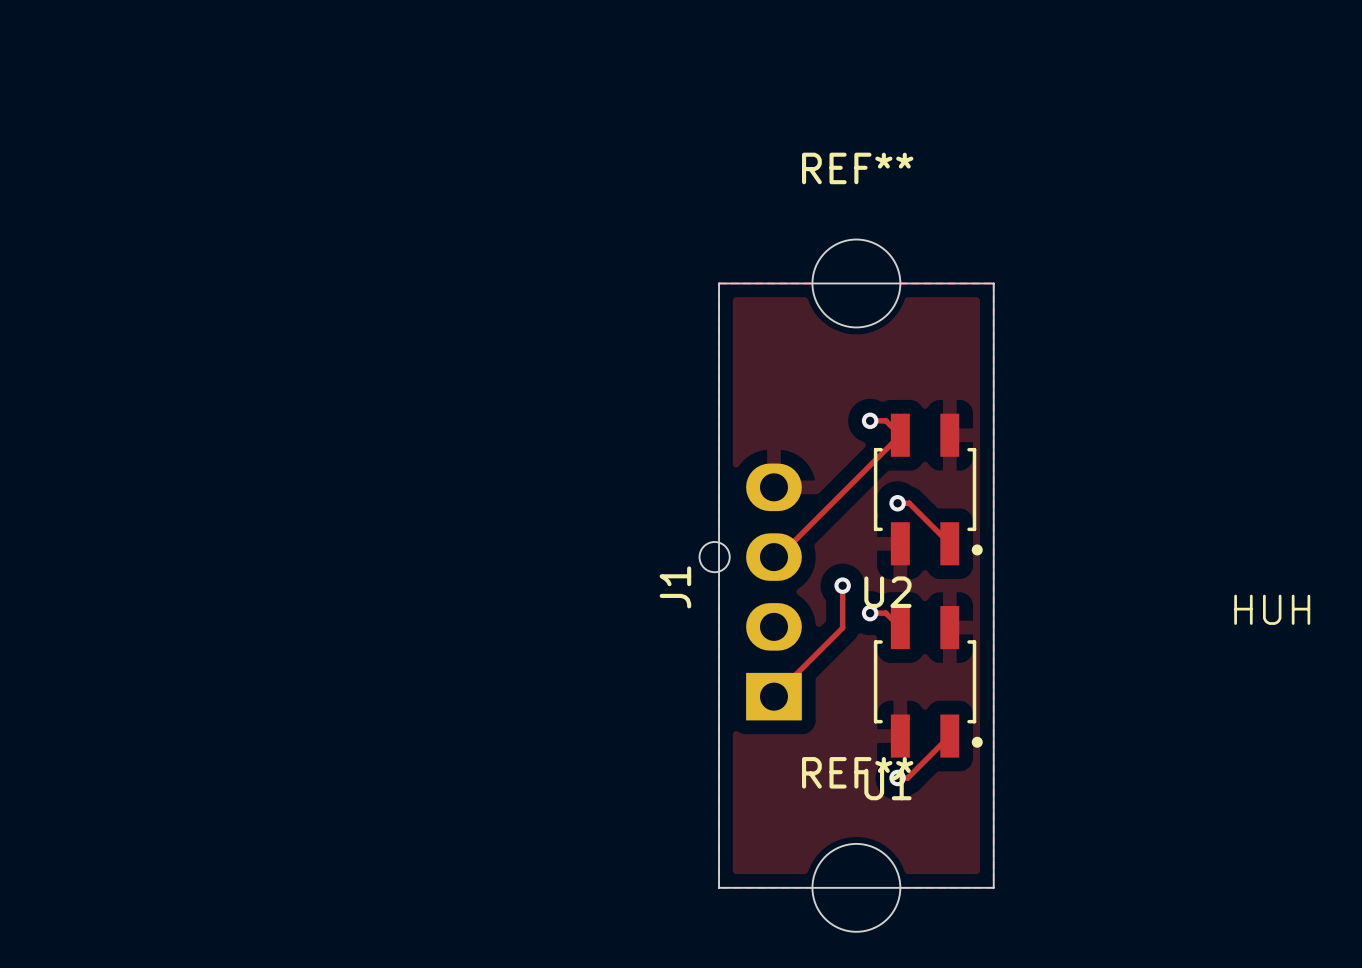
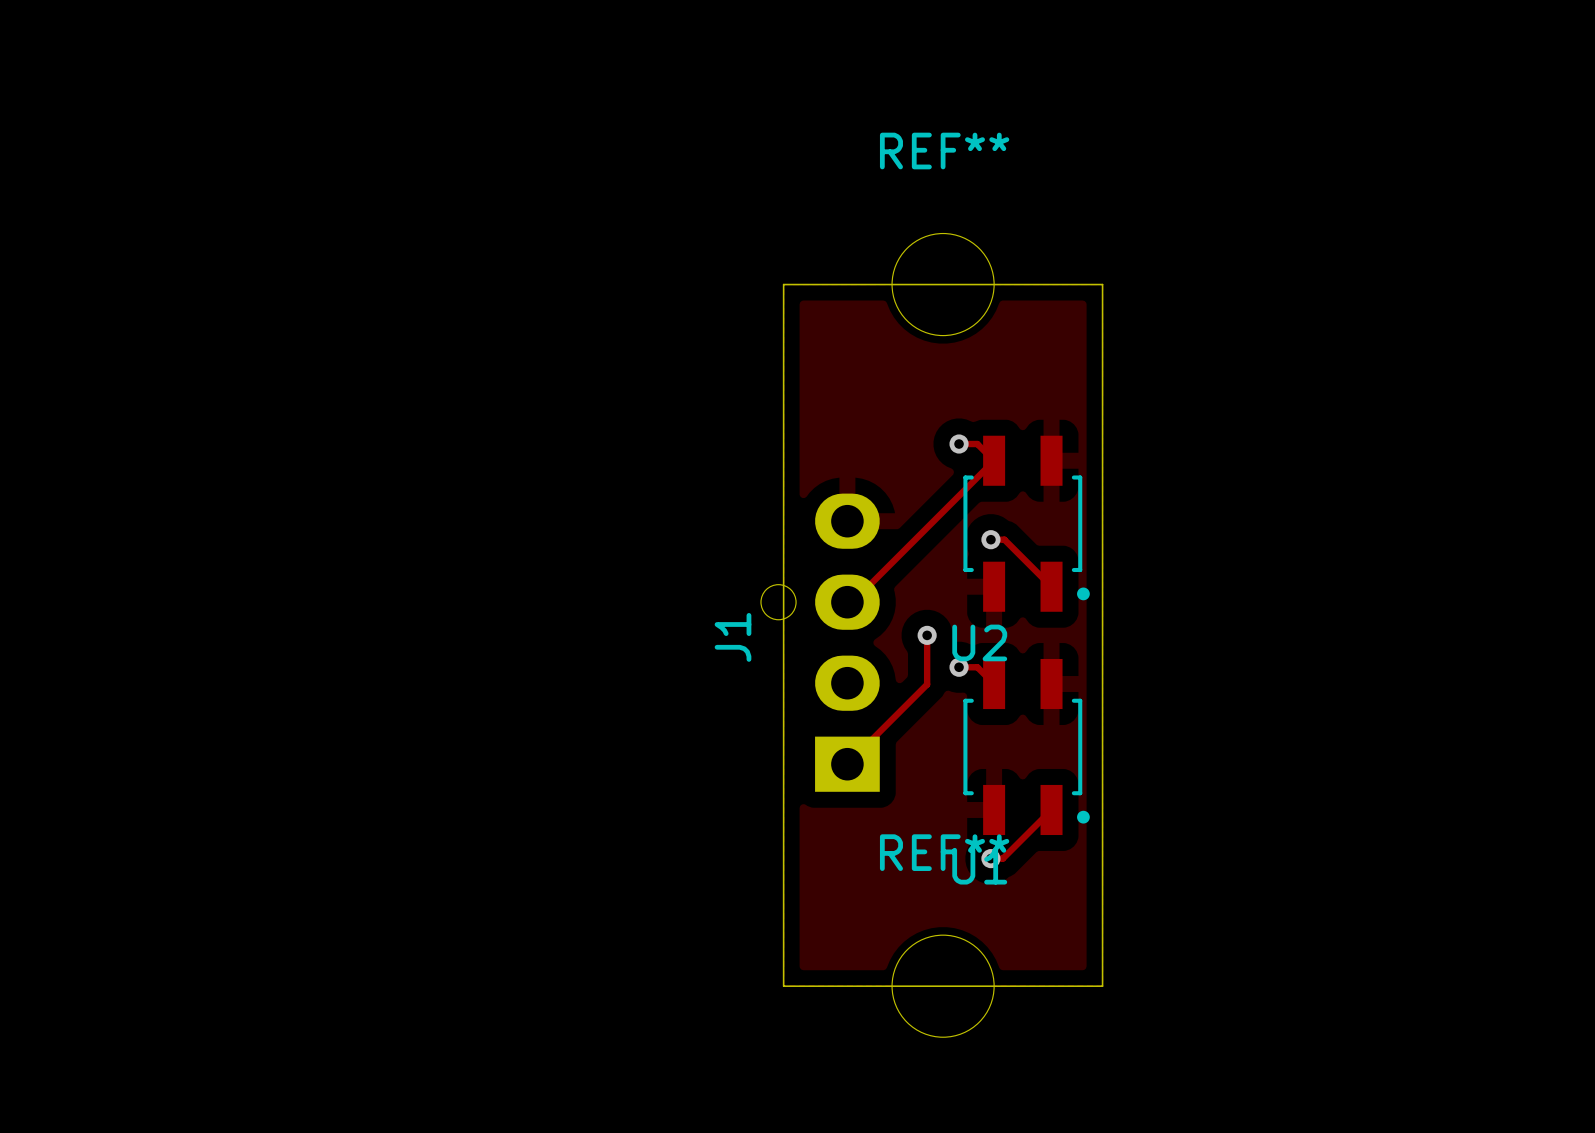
text: HUH (1272, 609) -> none

